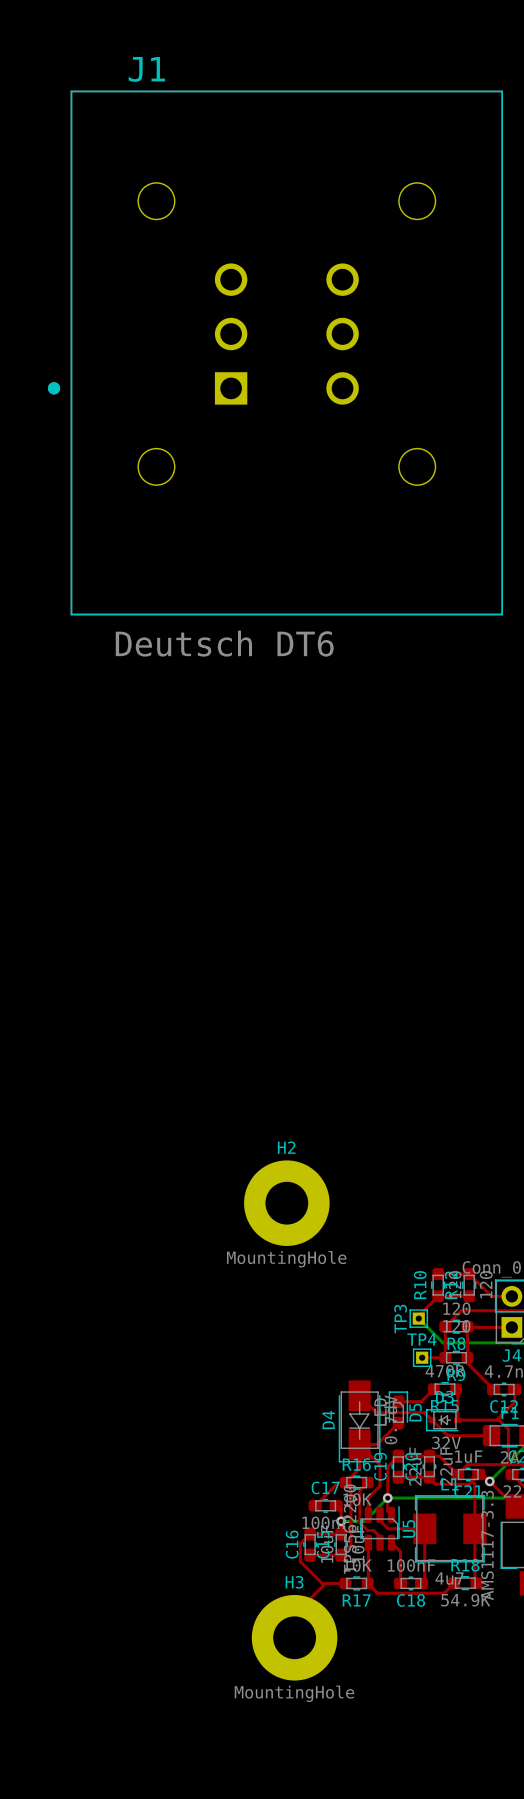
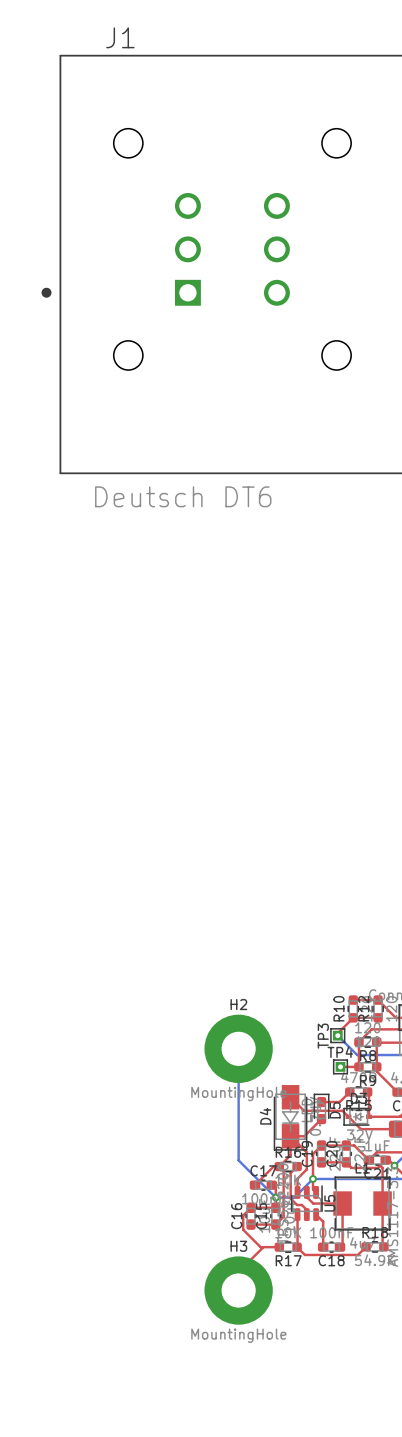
H2 position: (286, 1203) -> (238, 1048)
bottom track: none -> (238, 1048) (238, 1160) (275, 1197)

